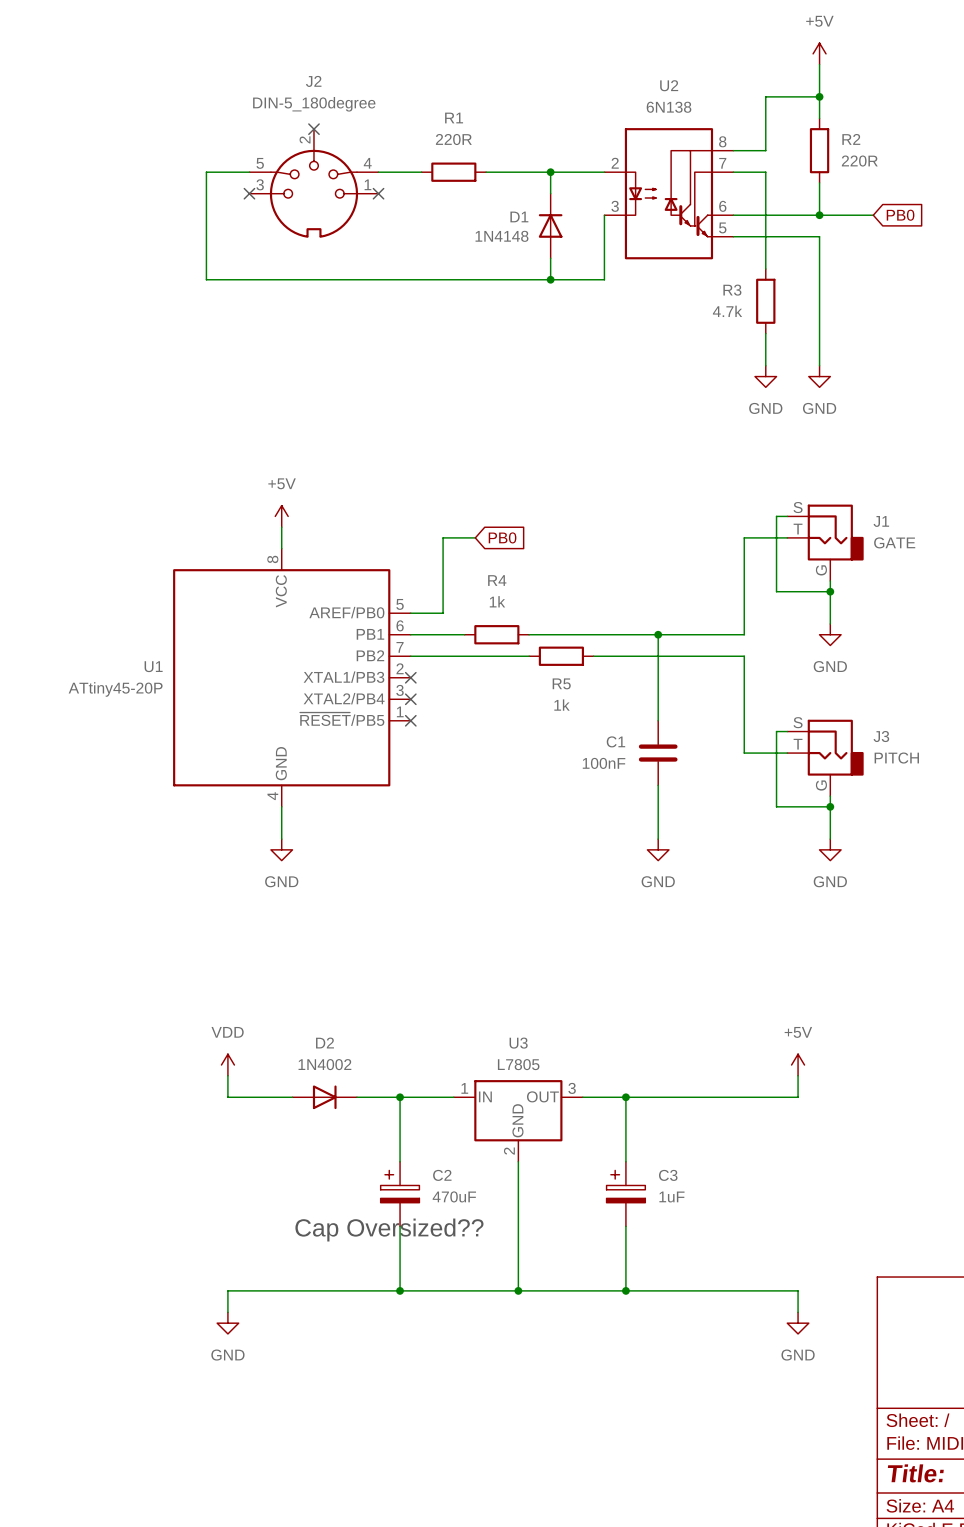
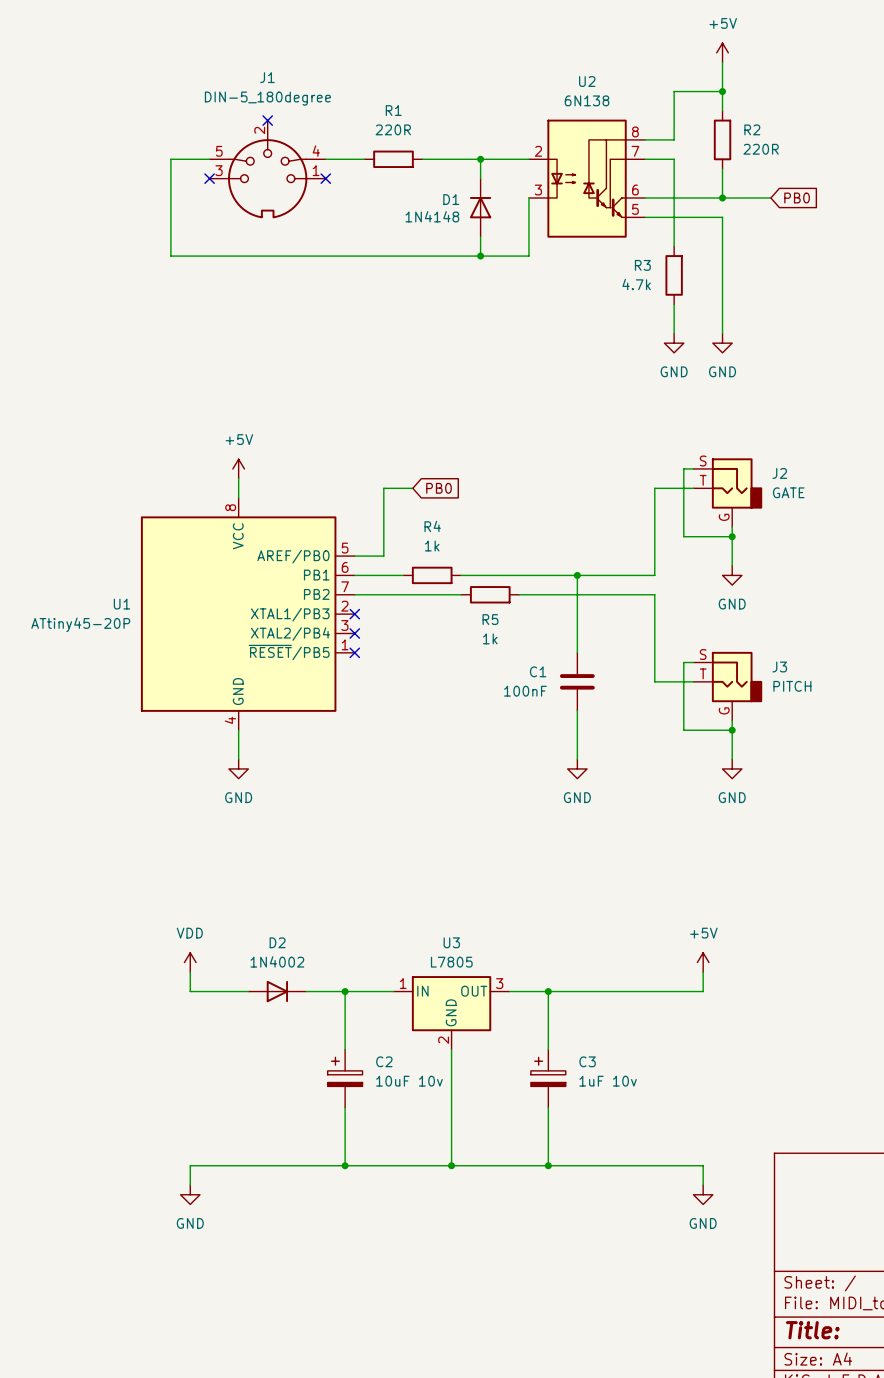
J2 name: J2 (313, 81) -> J1 (267, 77)
J1 name: J1 (881, 521) -> J2 (779, 473)
C2 value: 470uF (454, 1196) -> 10uF 10v (409, 1081)
C3 value: 1uF (671, 1196) -> 1uF 10v (608, 1081)
text: Cap Oversized?? (389, 1230) -> none

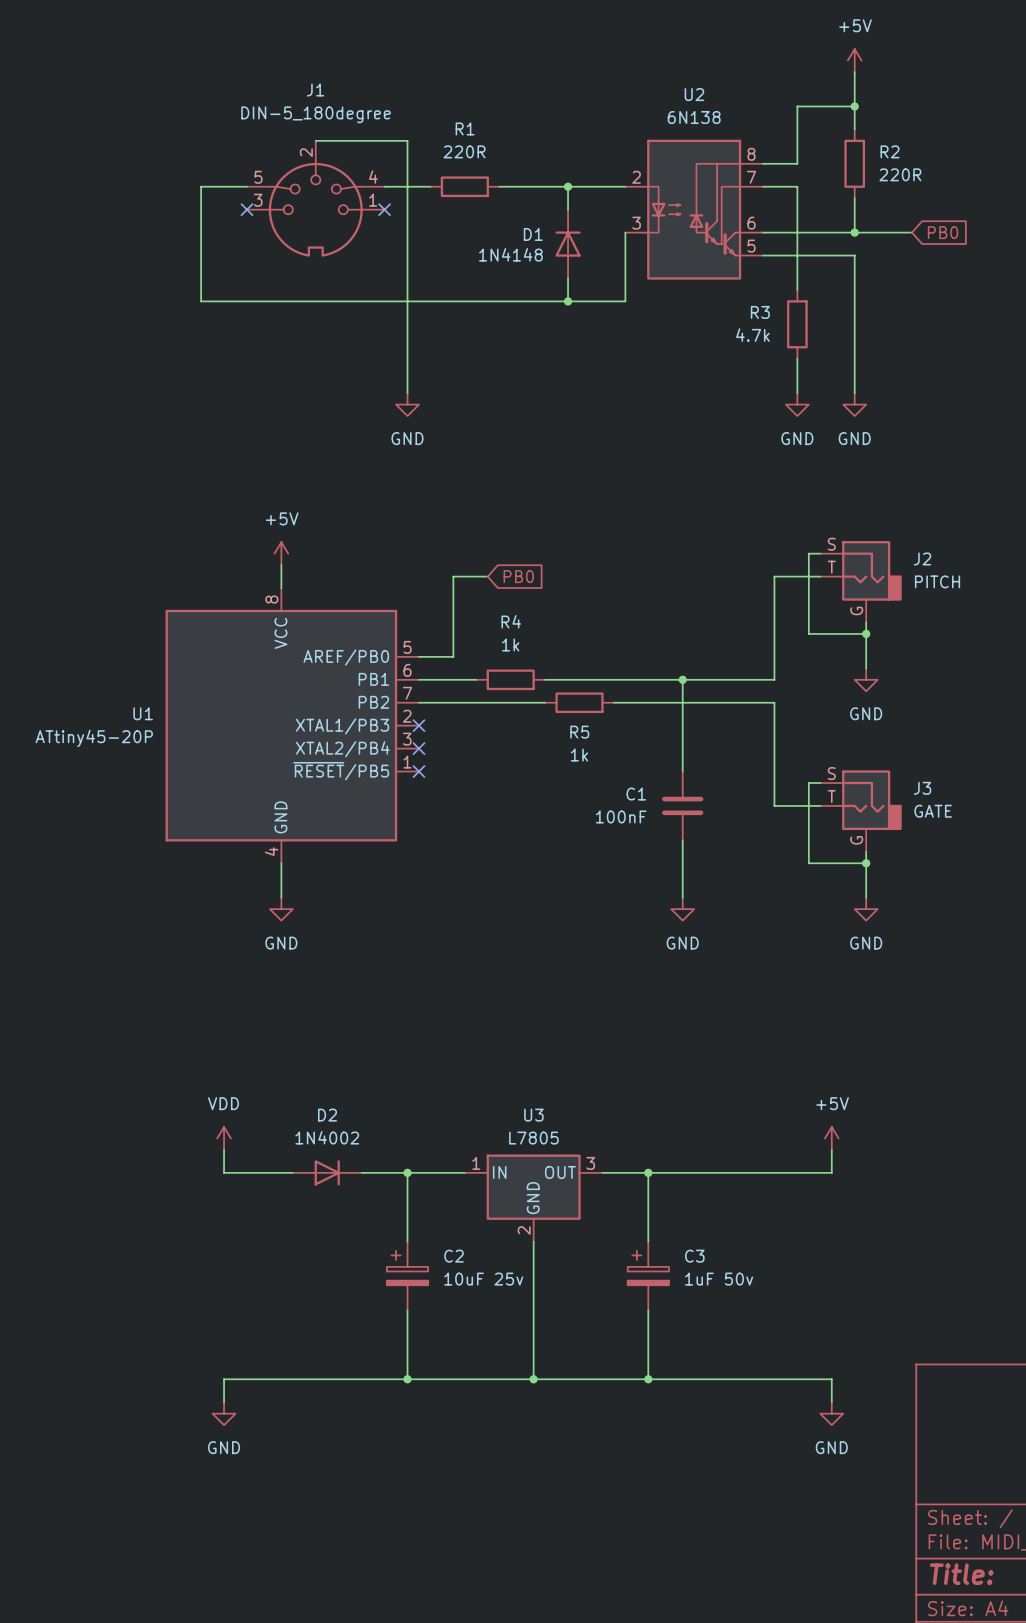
wire: none -> (315, 140) (407, 140) (407, 393)
no-connect mark: (267, 120) -> none
power symbol: none -> GND (407, 404)
J2 value: GATE (788, 492) -> PITCH (937, 581)
J3 value: PITCH (792, 686) -> GATE (933, 811)
C2 value: 10uF 10v (409, 1081) -> 10uF 25v (483, 1279)
C3 value: 1uF 10v (608, 1081) -> 1uF 50v (719, 1279)

